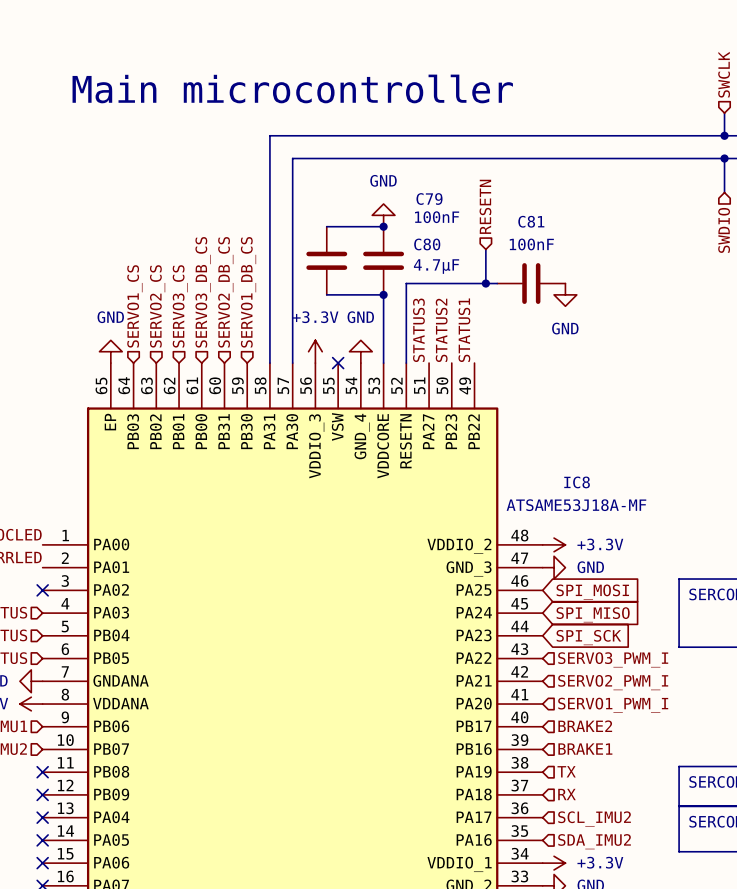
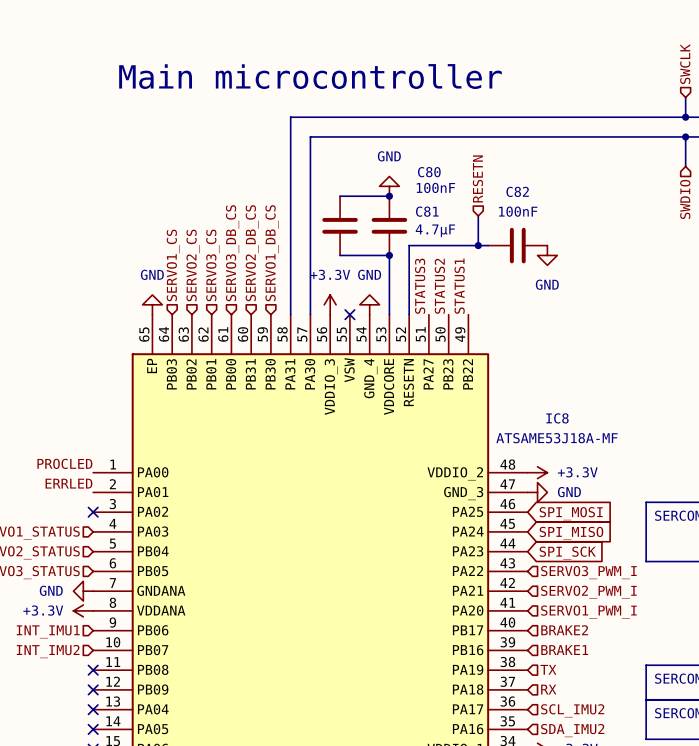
C79 name: C79 (429, 199) -> C80 (429, 172)
C81 name: C81 (531, 221) -> C82 (517, 191)
C80 name: C80 (427, 244) -> C81 (427, 211)

